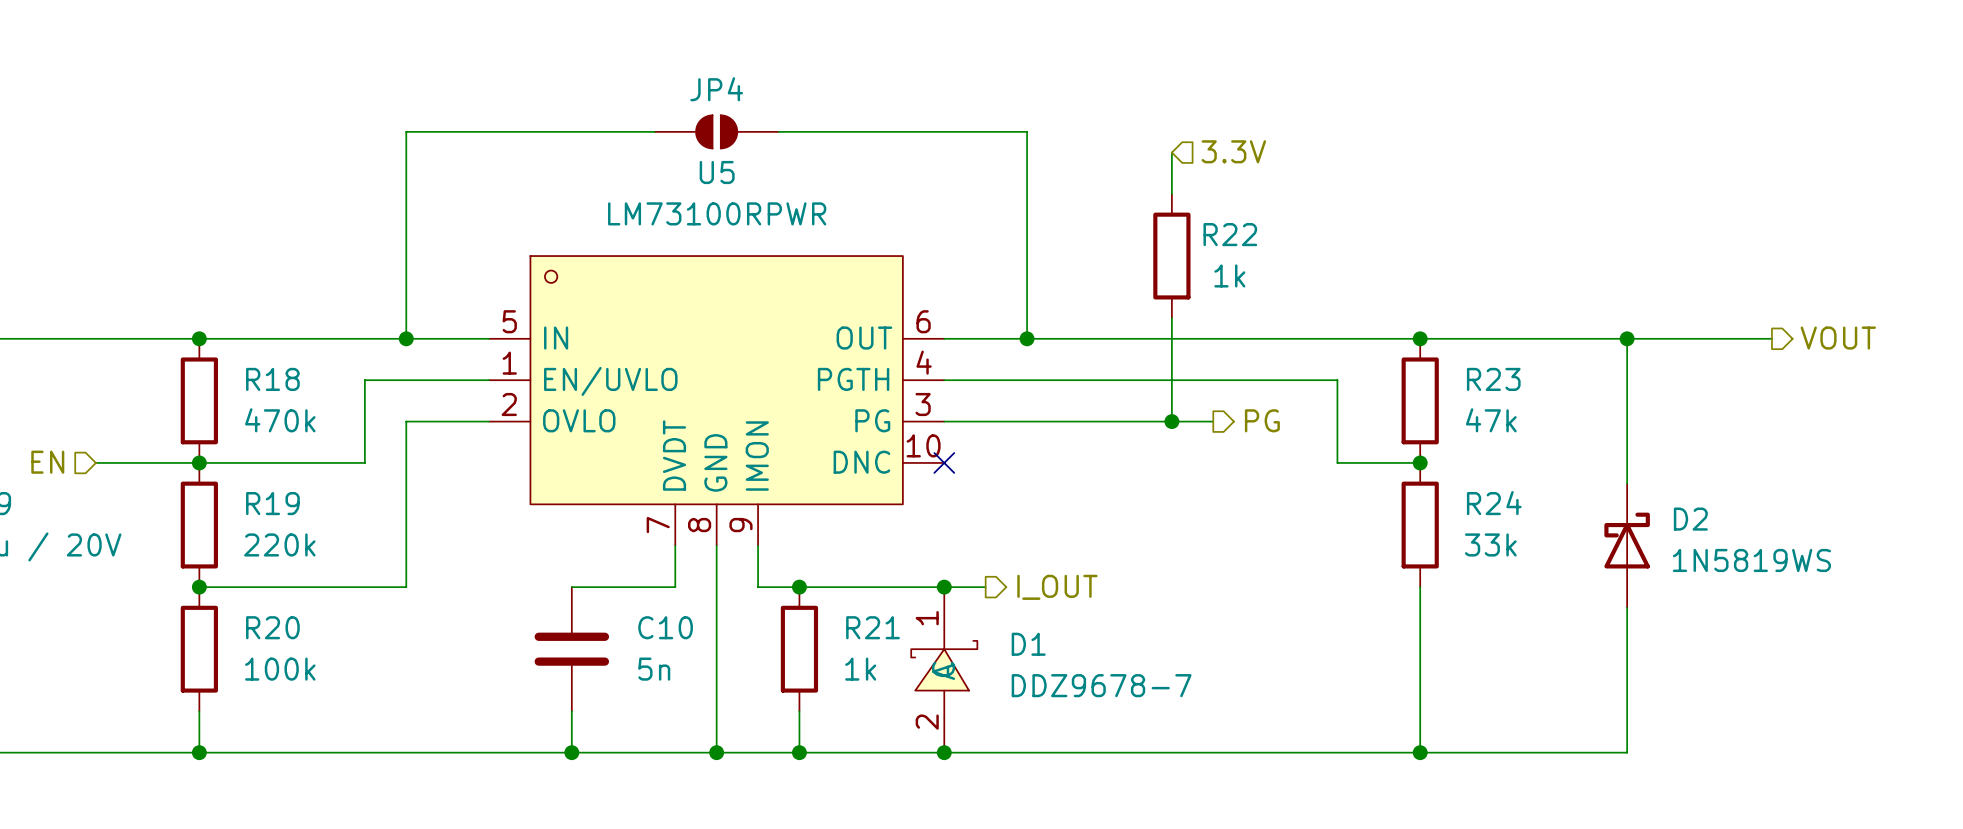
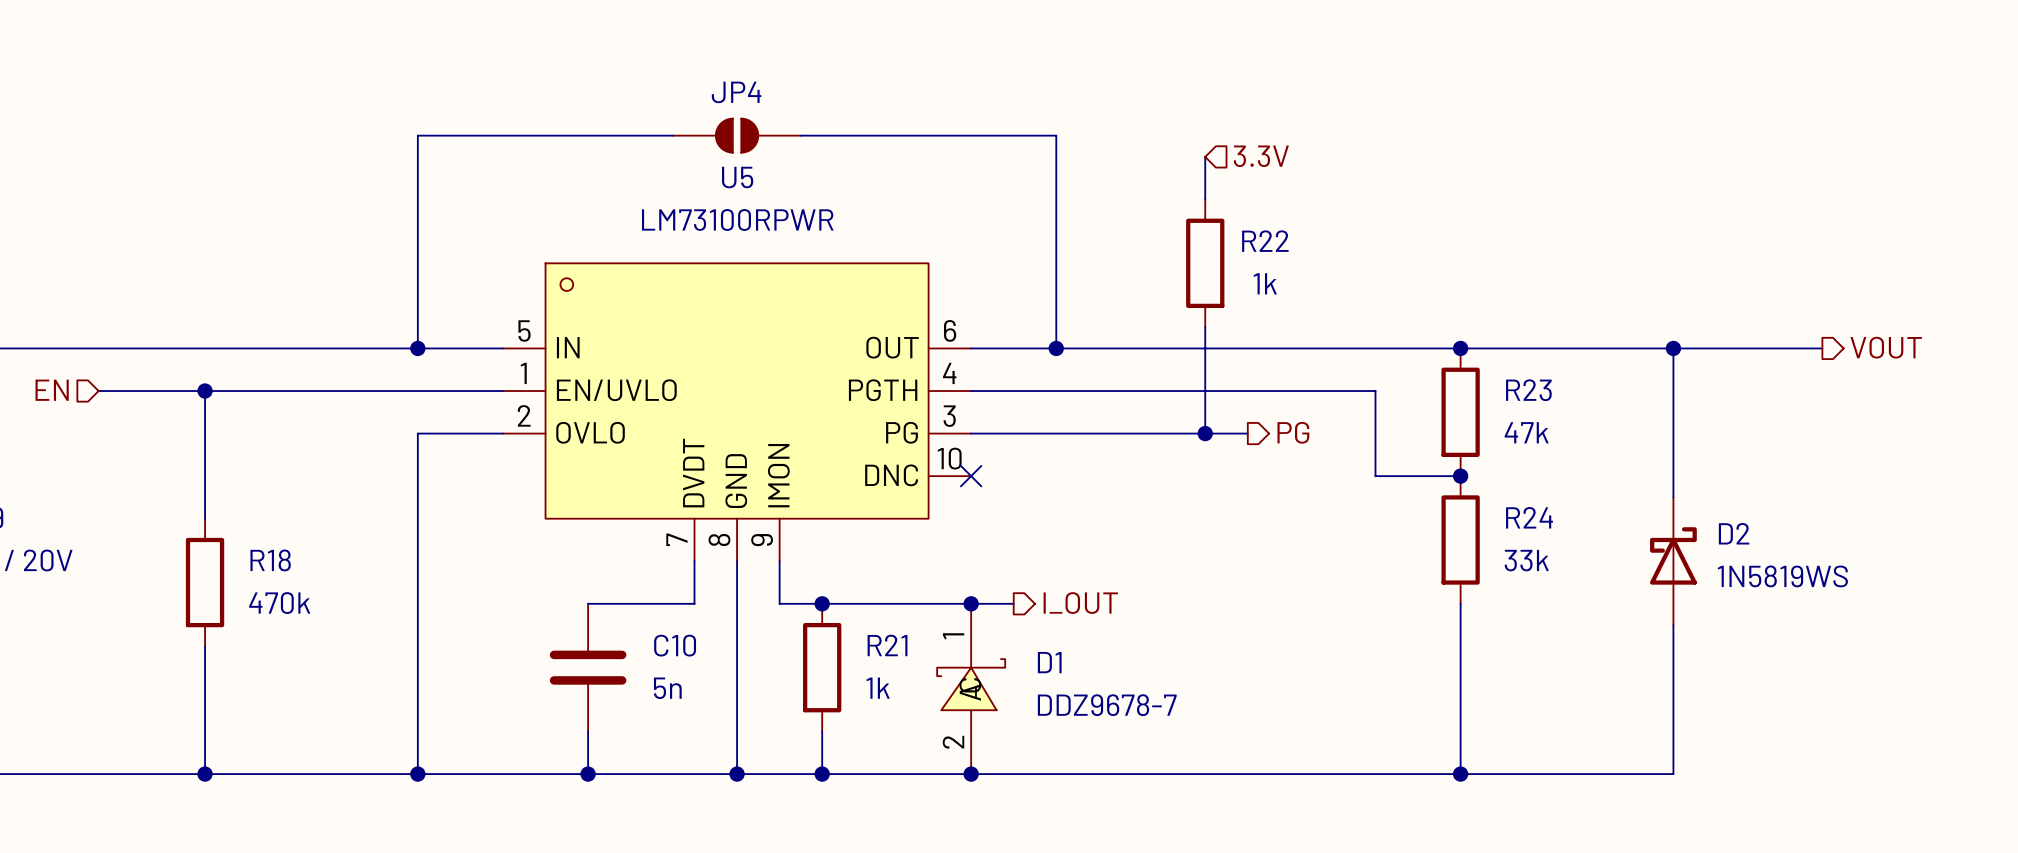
junction: (199, 338) -> none
wire: none -> (205, 391) (205, 518)
junction: none -> (205, 391)
wire: (364, 380) (364, 462) (95, 462) -> (375, 391) (98, 391)
R18 position: (199, 400) -> (205, 582)
hierarchical label position: EN (47, 462) -> EN (52, 390)
junction: (199, 462) -> none
R19: 220k (199, 525) -> none
wire: (199, 587) (406, 587) -> (417, 774) (417, 603)
junction: (199, 587) -> none
wire: none -> (205, 646) (205, 731)
R20: 100k (199, 649) -> none
junction: none -> (417, 774)

